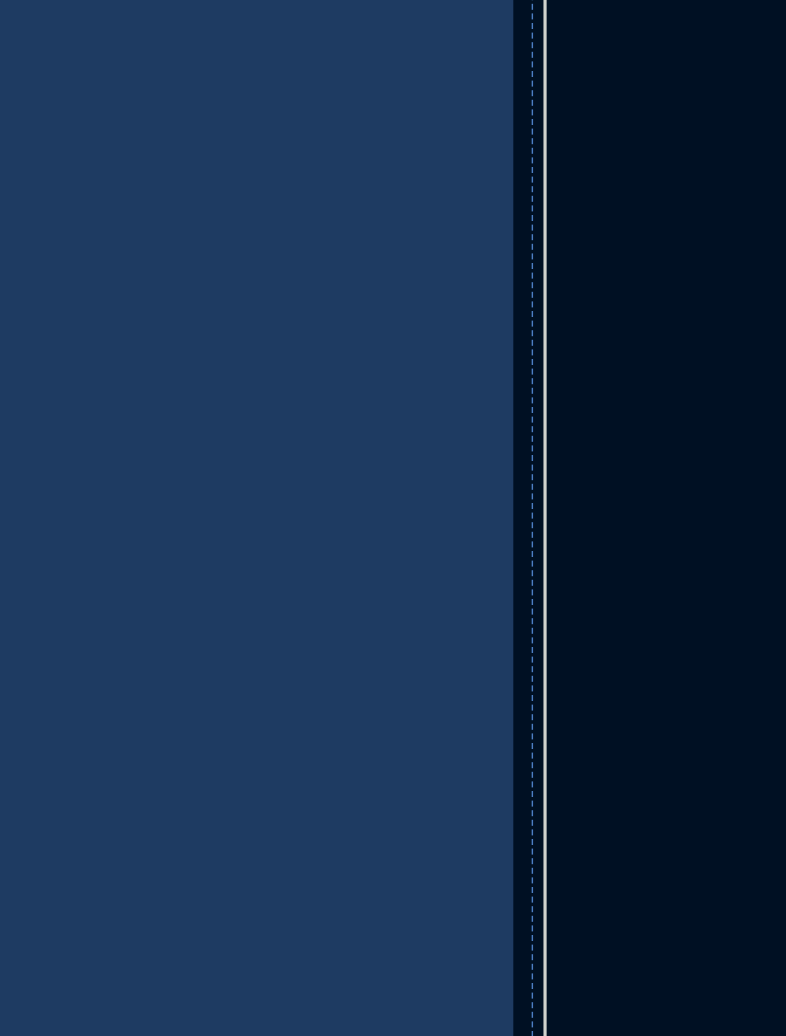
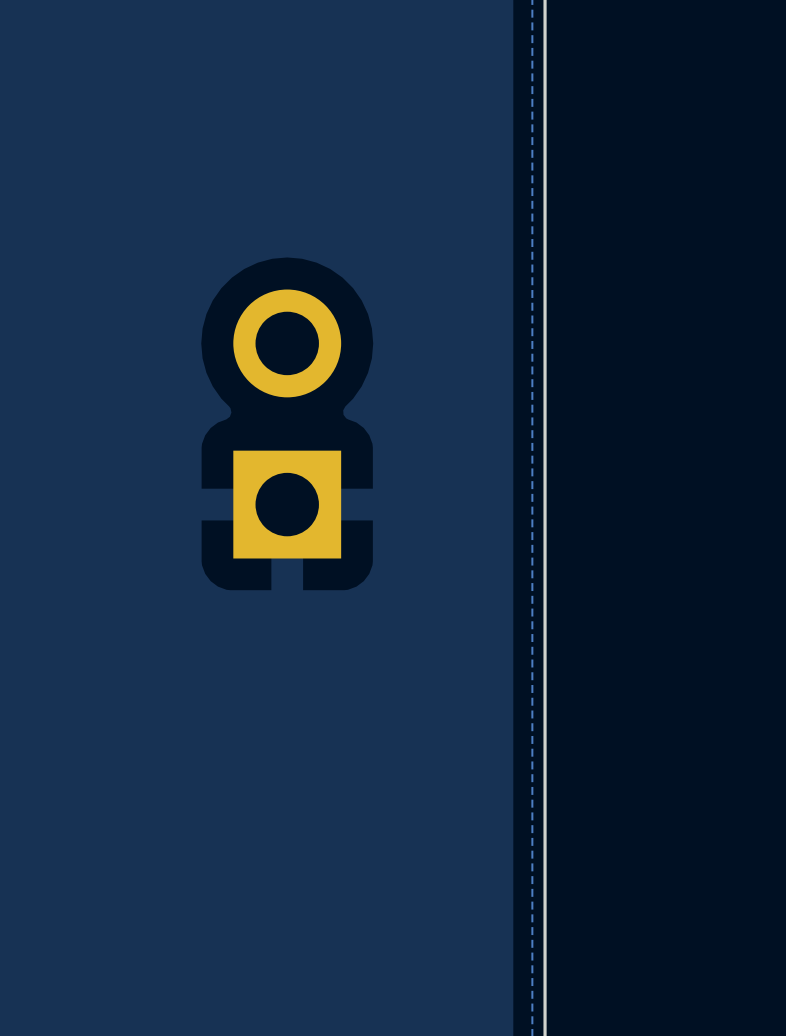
part: none -> (287, 424)

